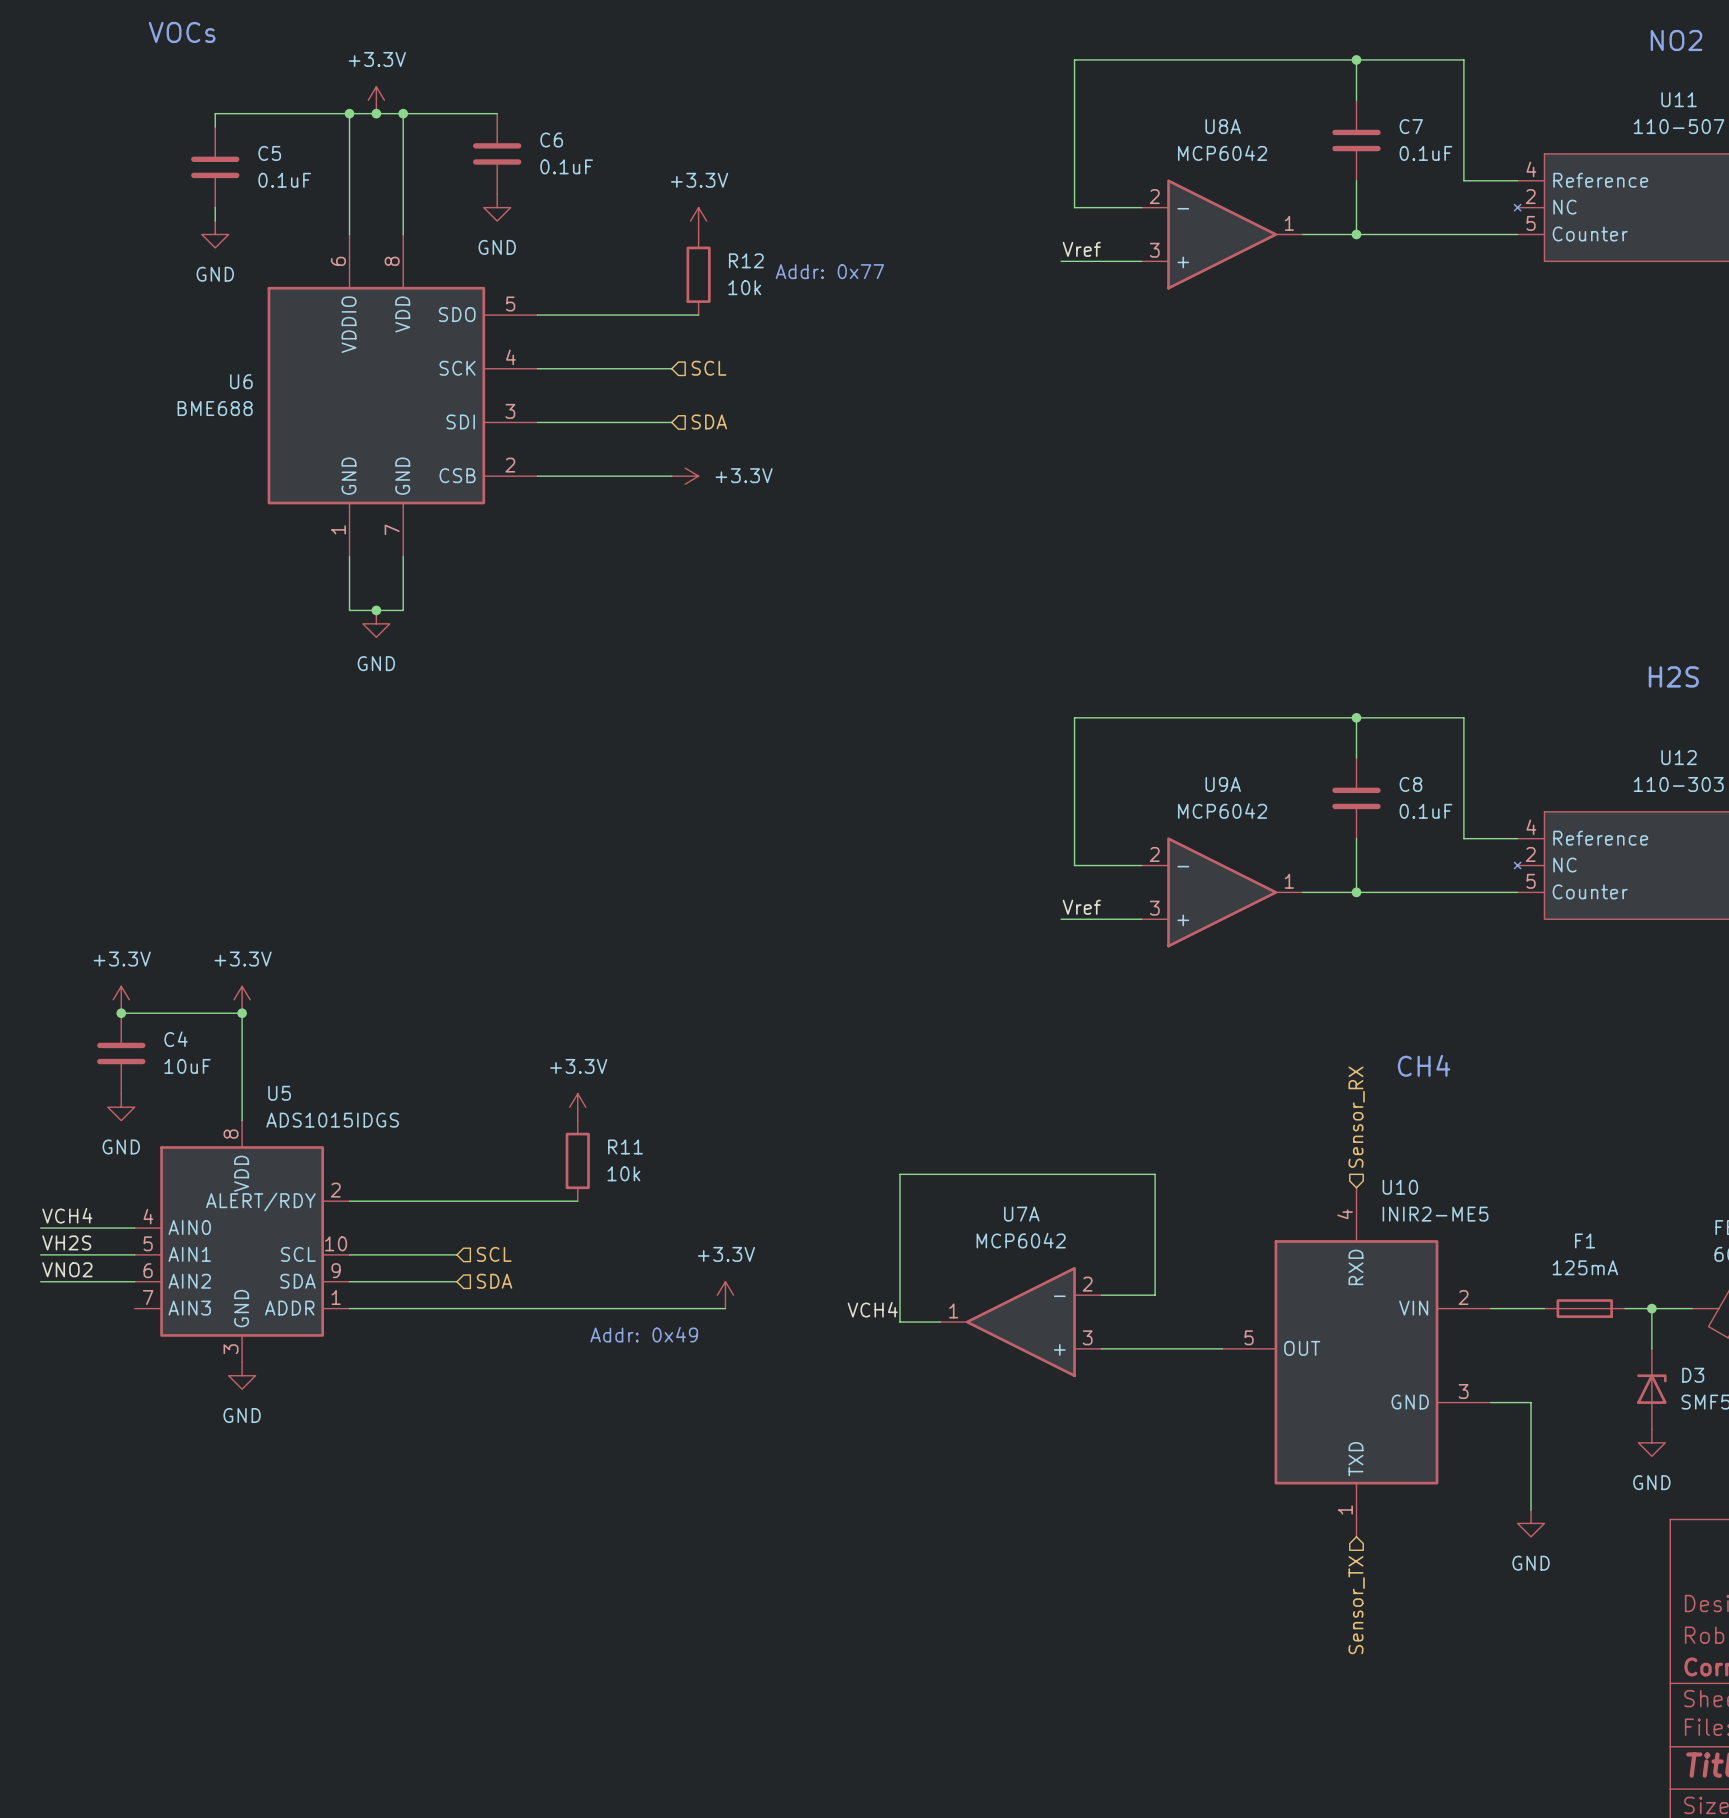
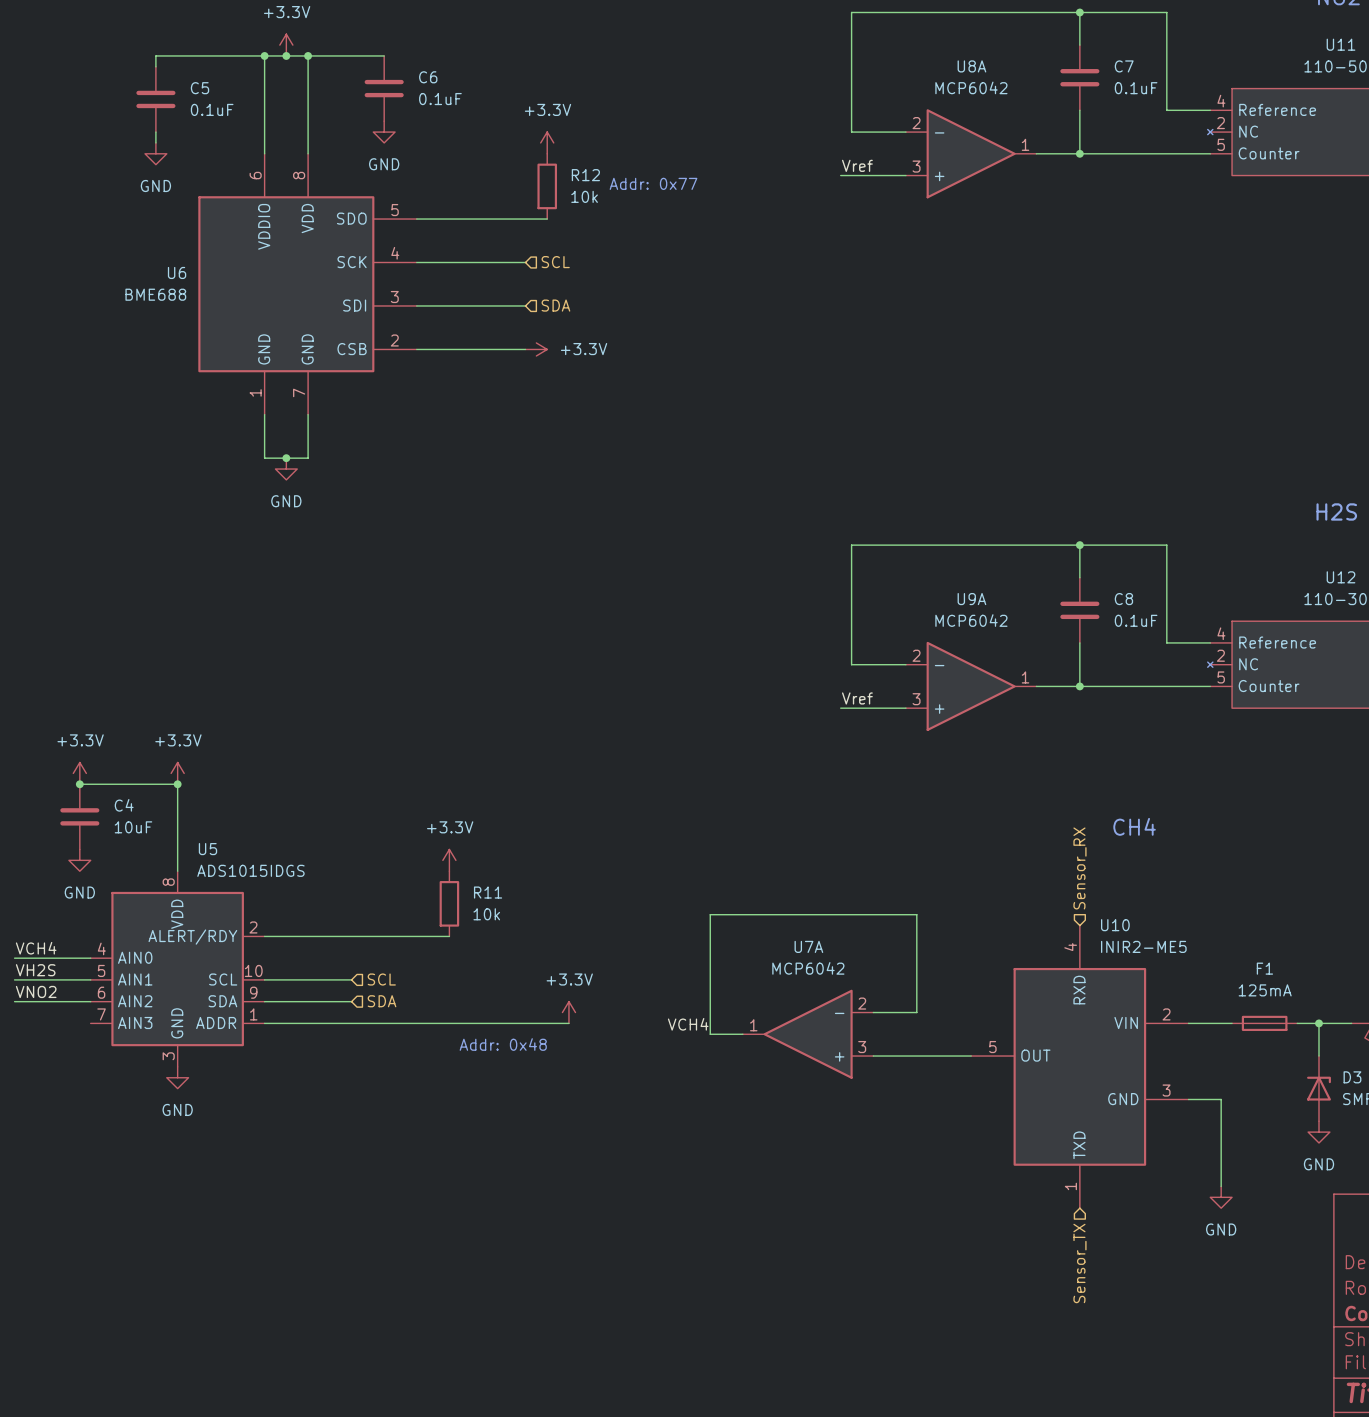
text: Addr: 0x49 (644, 1334) -> Addr: 0x48 (503, 1044)

